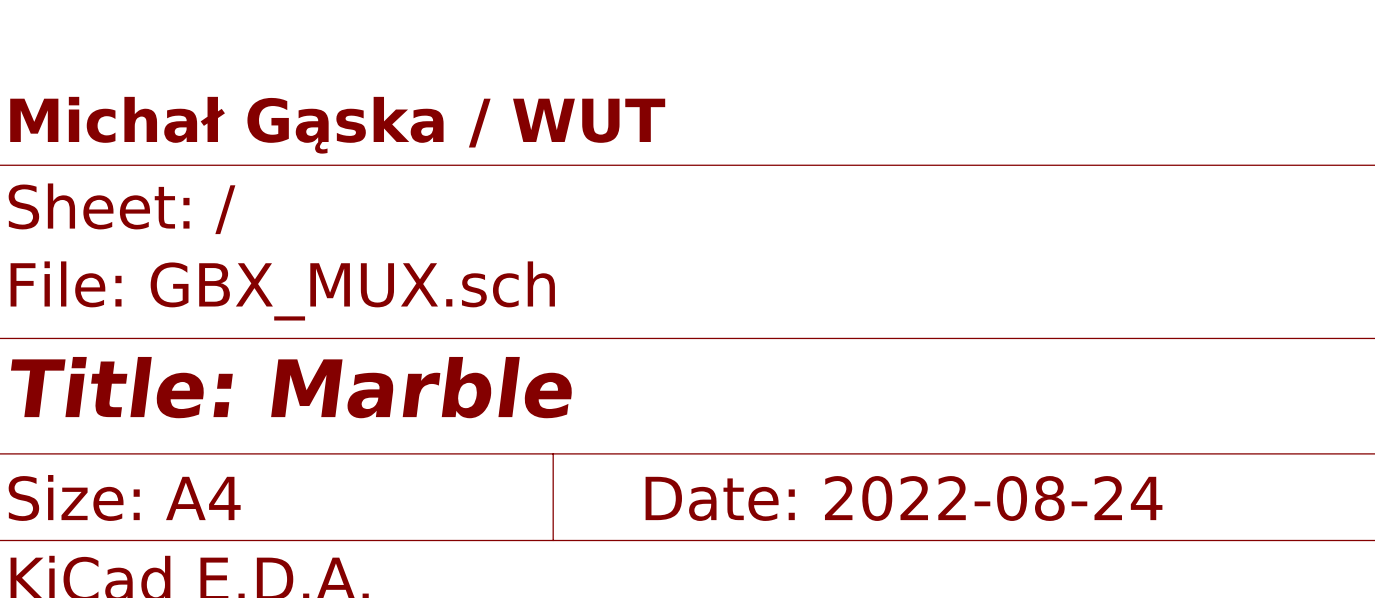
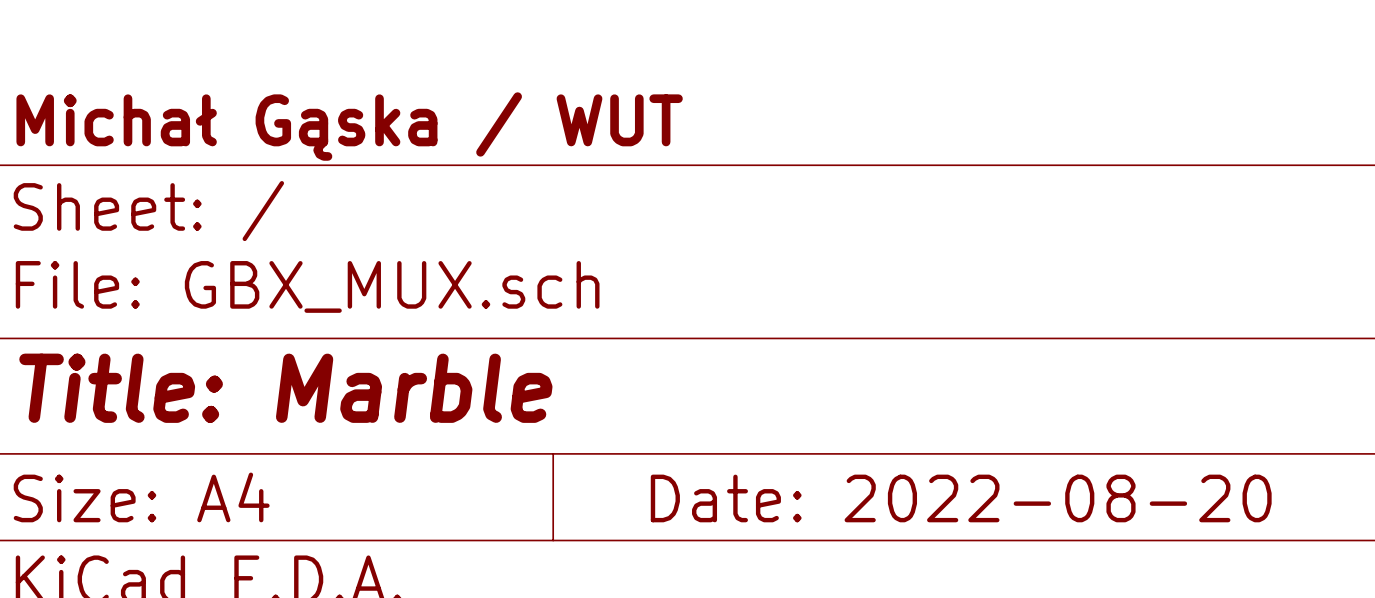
title block: Date: 2022-08-24 (904, 498) -> Date: 2022-08-20 (961, 498)

